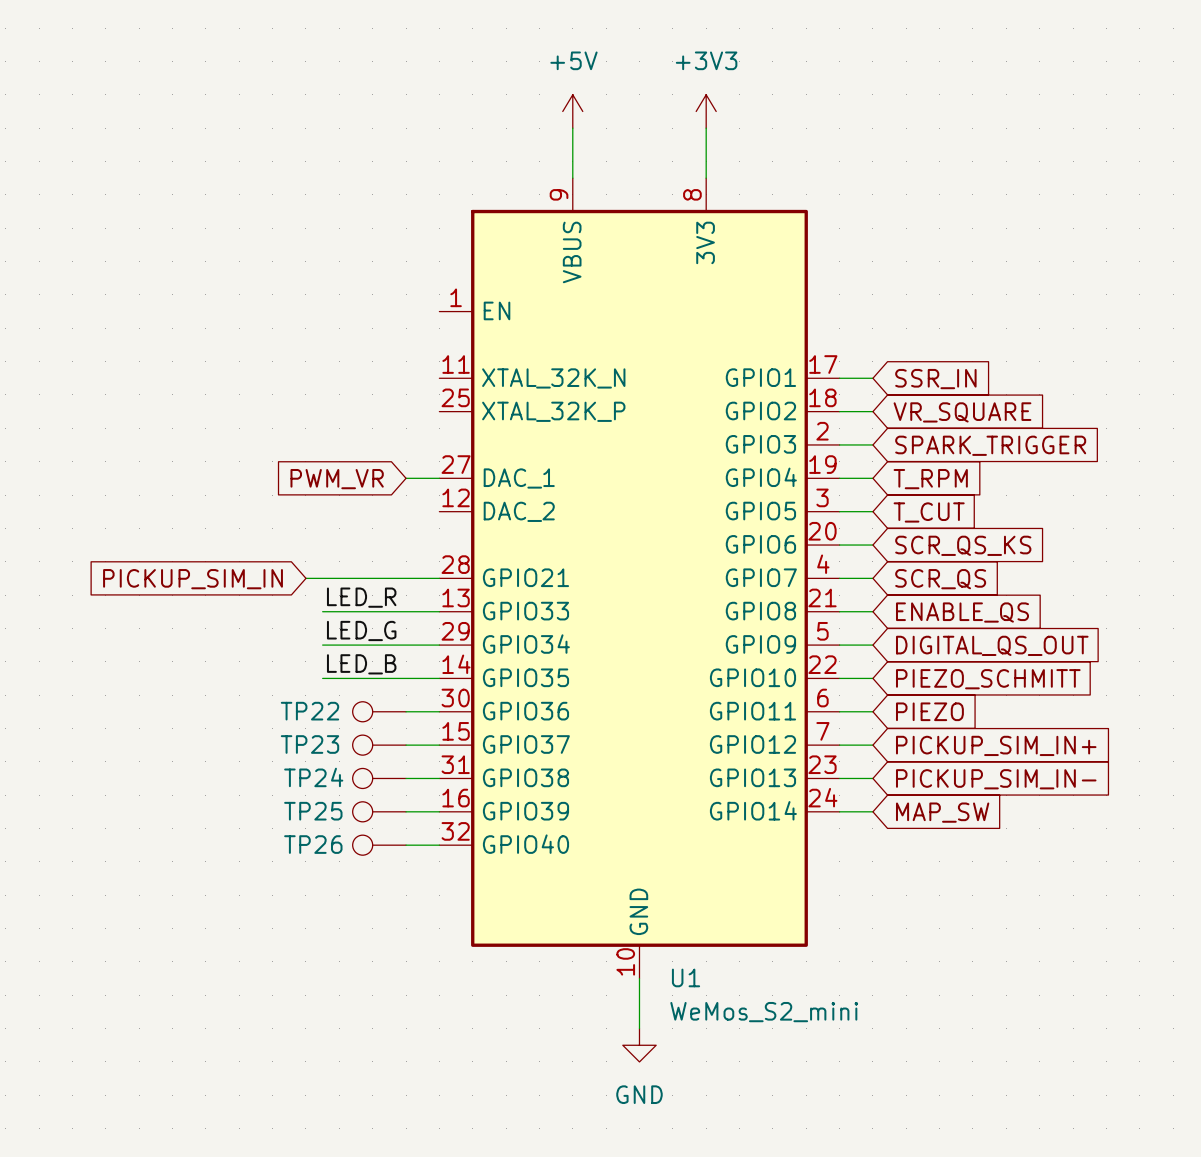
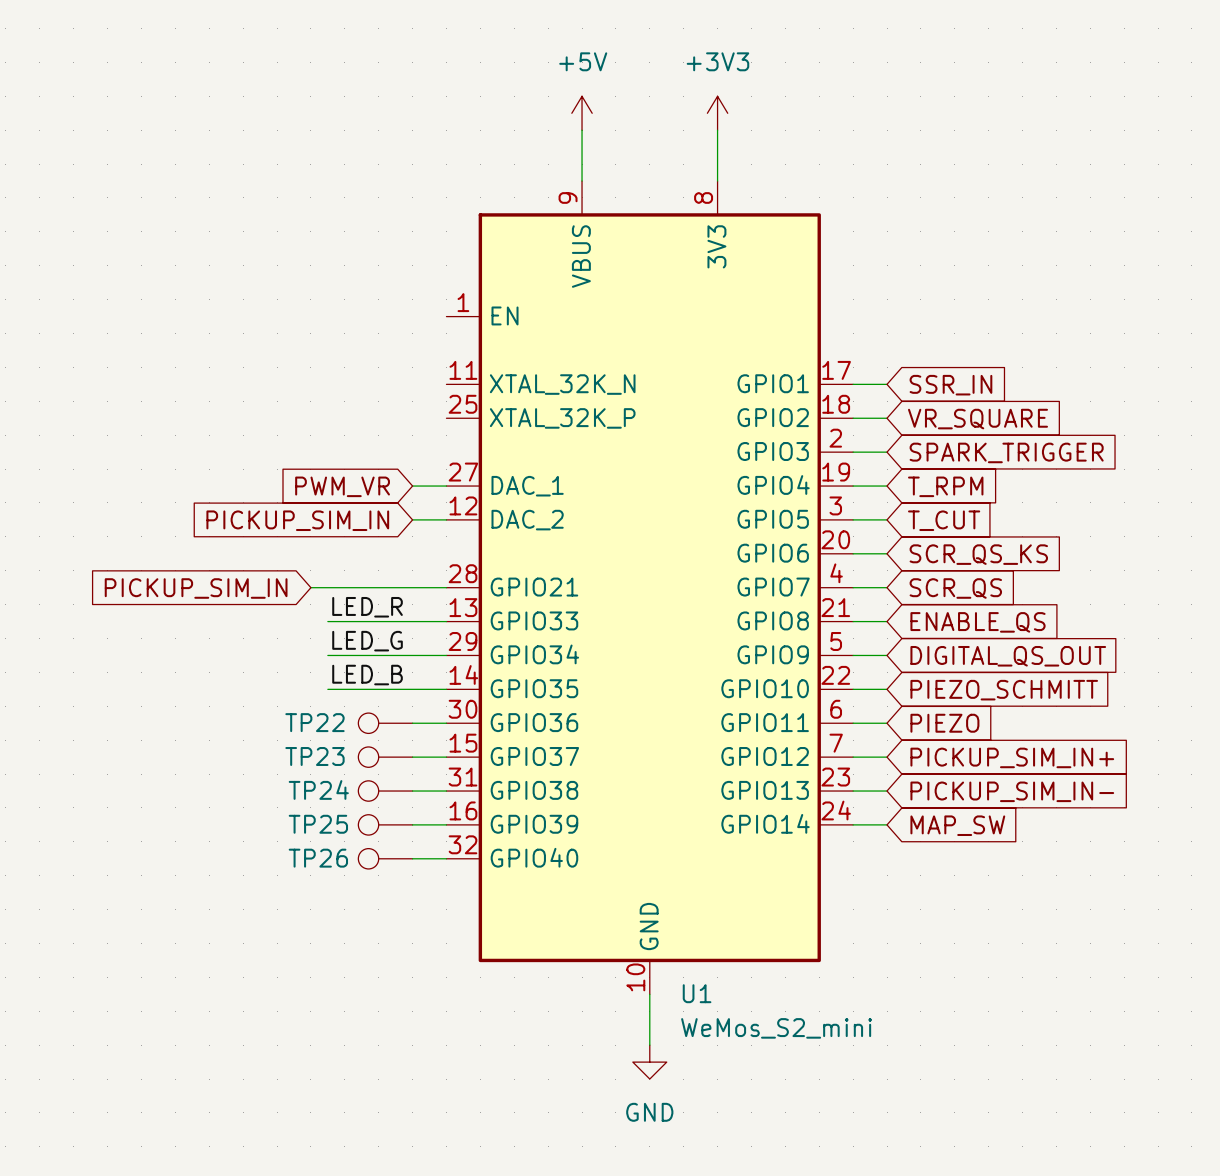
wire: none -> (412, 519) (446, 519)
global label: none -> PICKUP_SIM_IN (297, 520)

